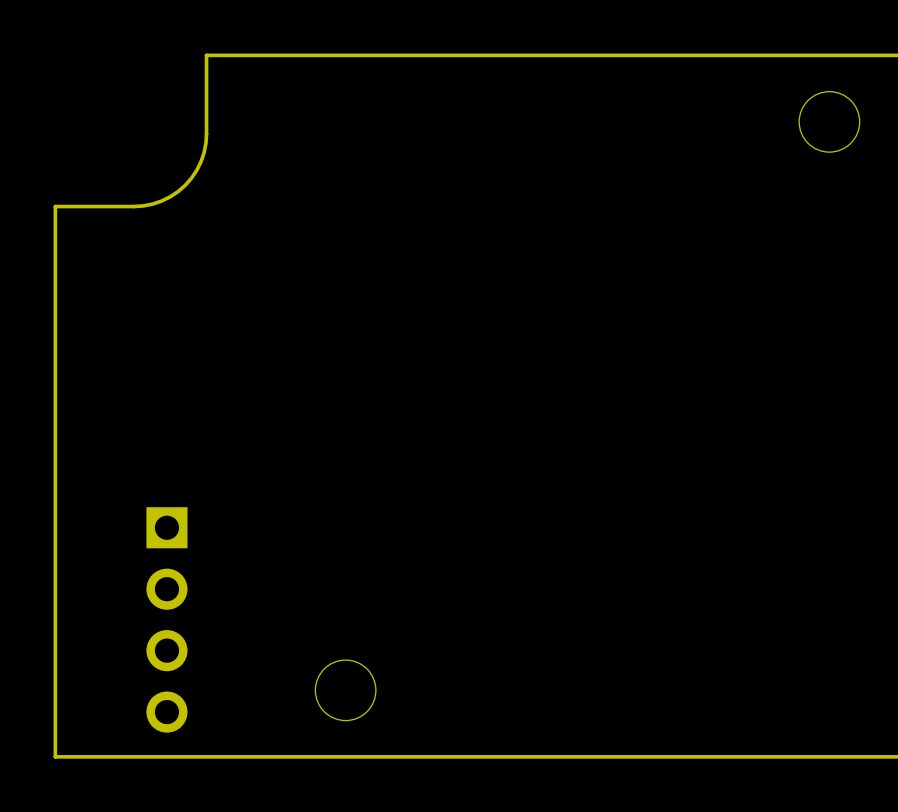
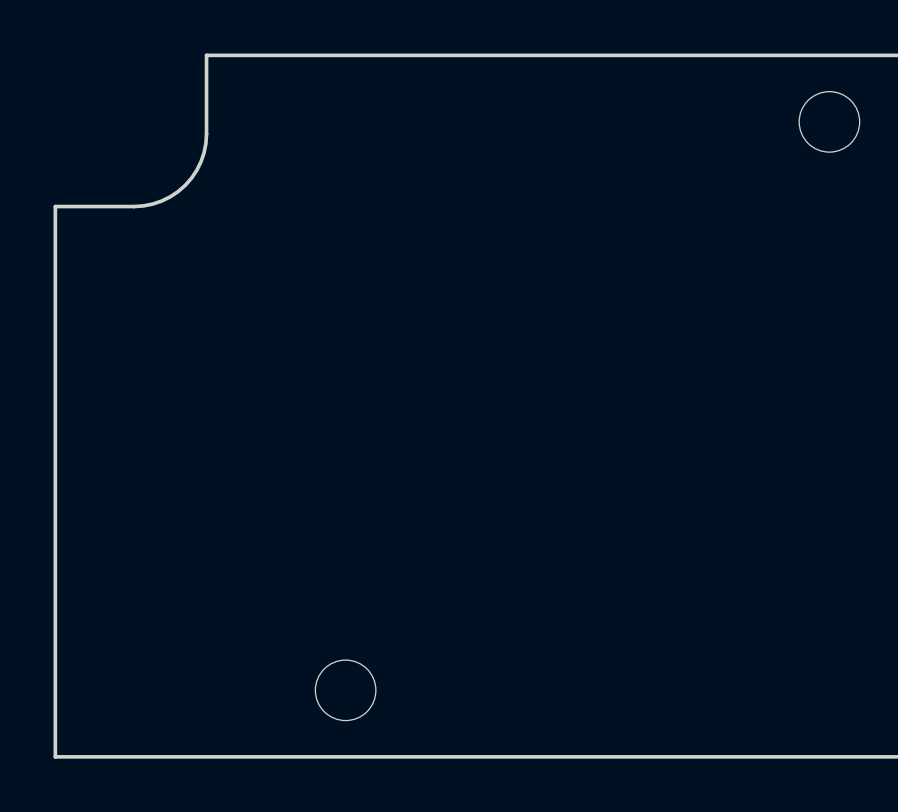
part: (166, 619) -> none

